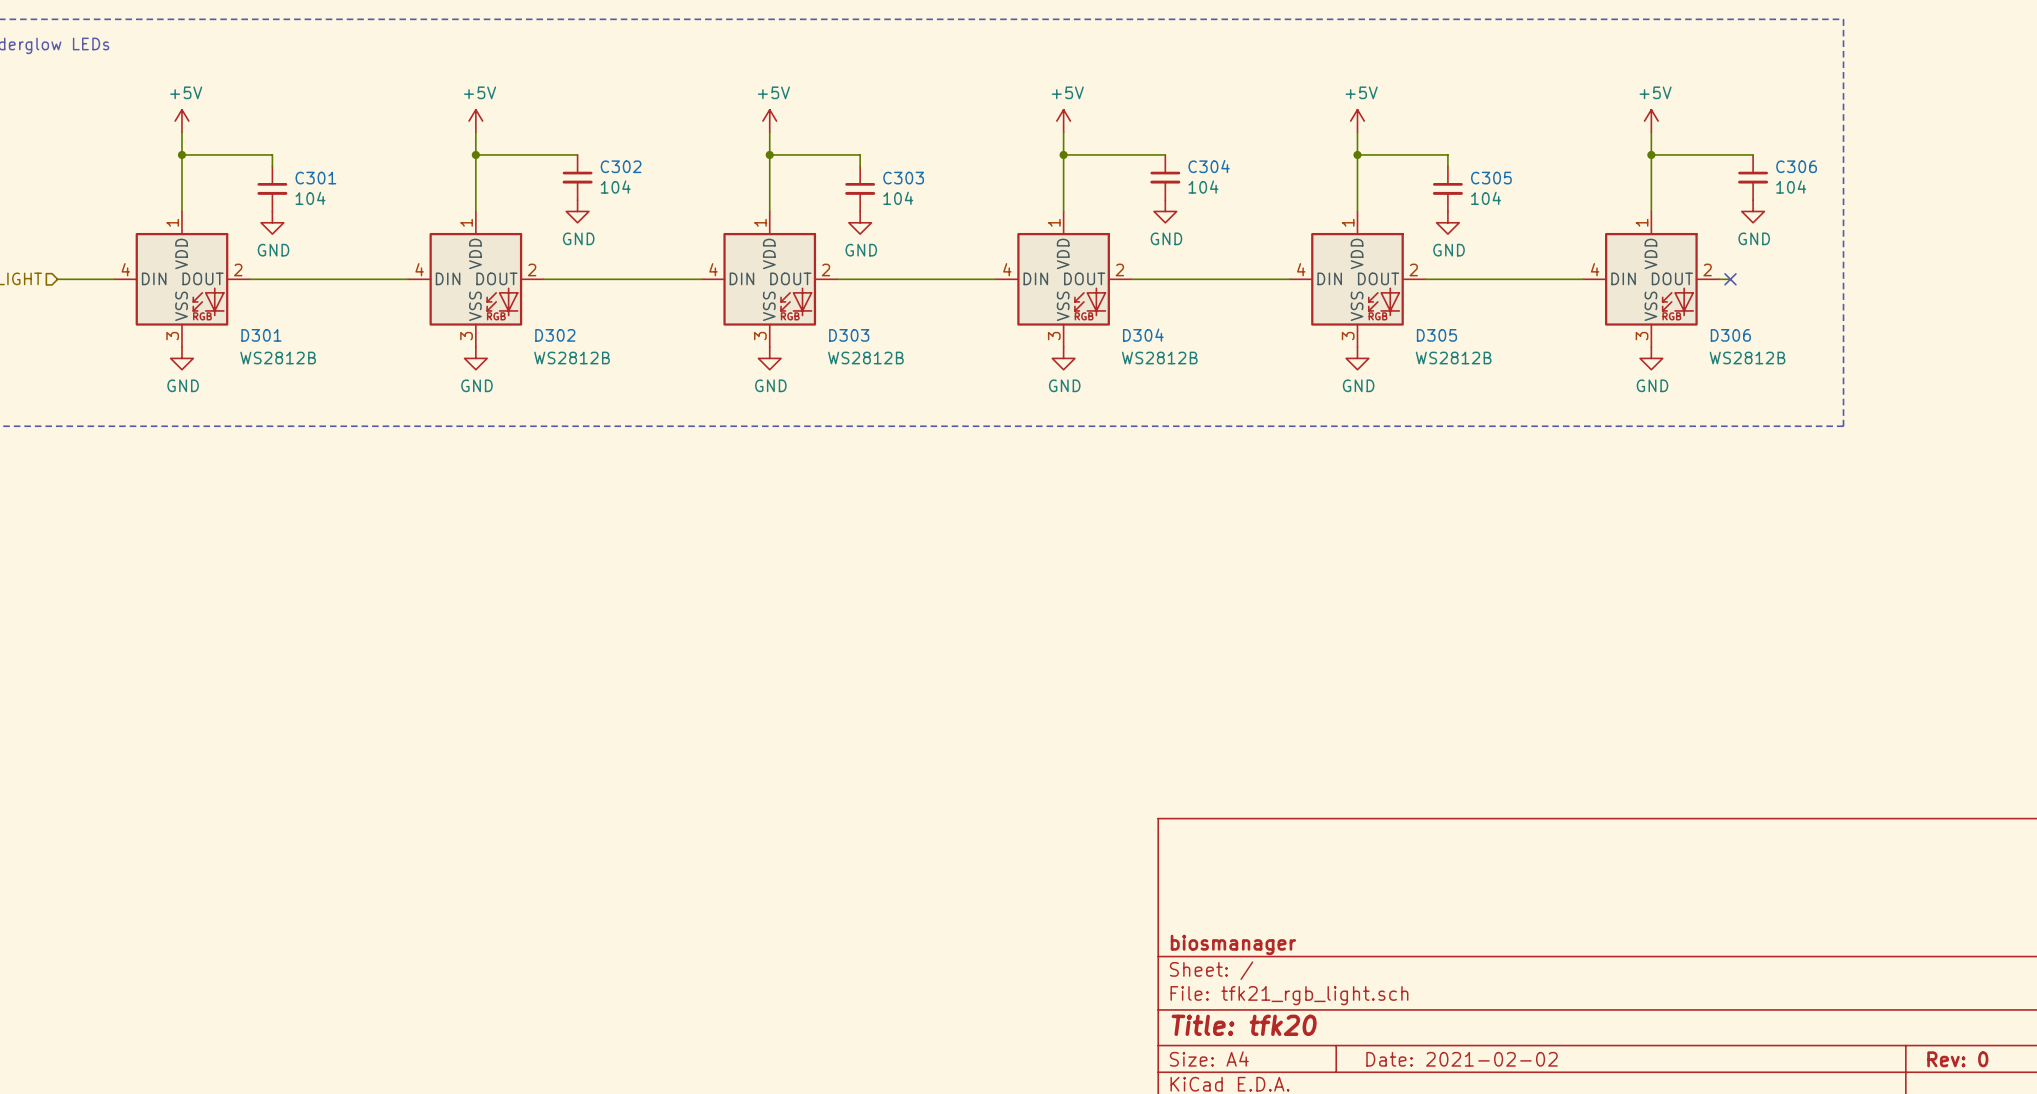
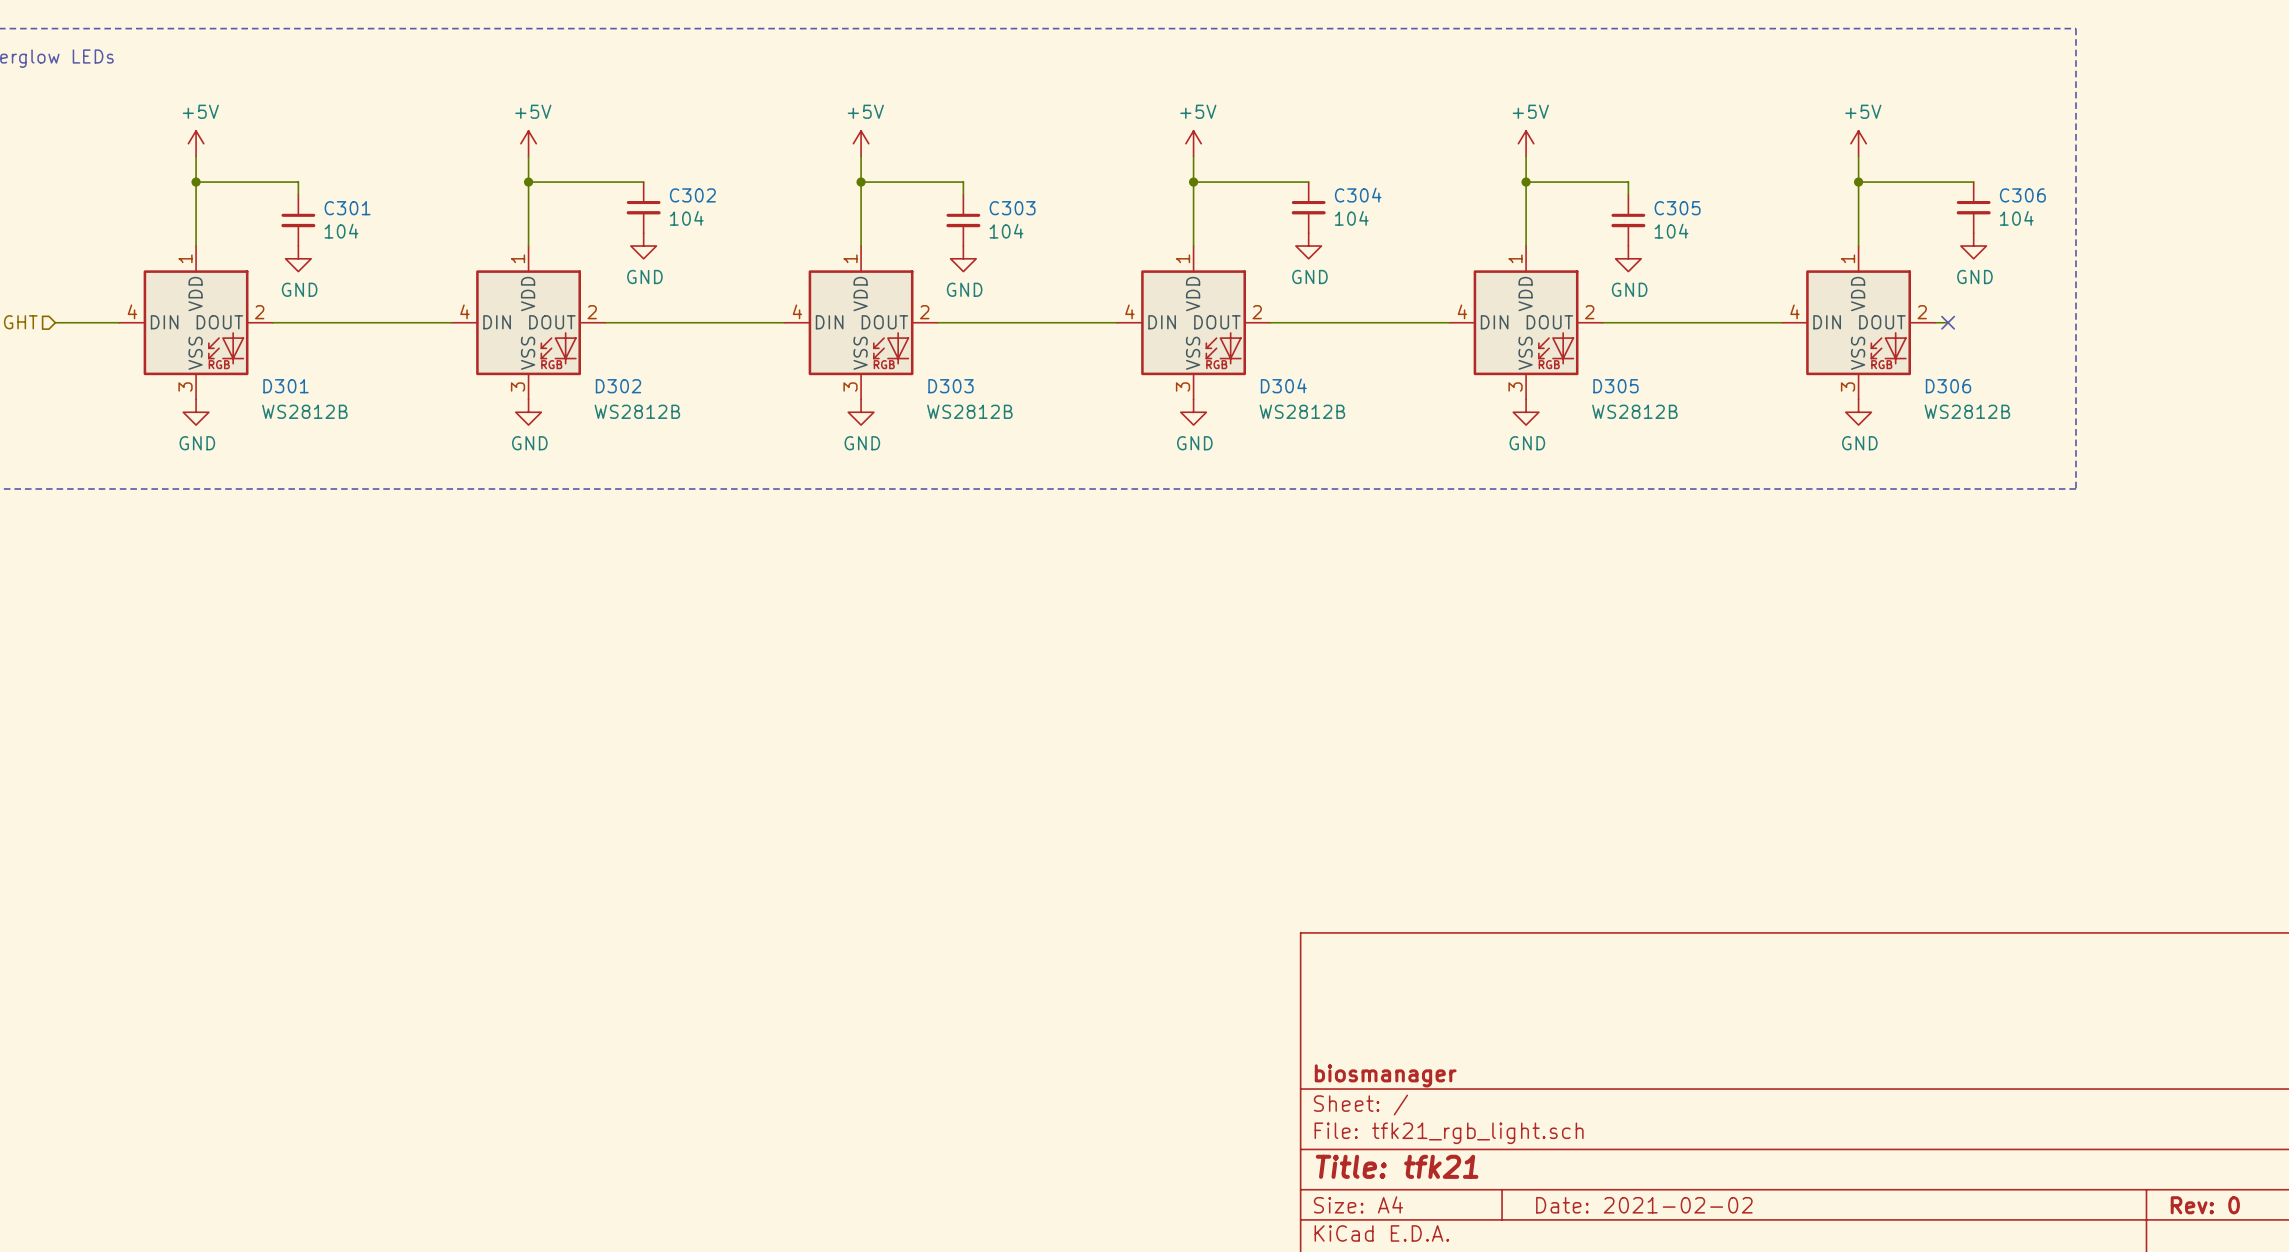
title block: Title: tfk20 (1244, 1025) -> Title: tfk21 (1397, 1166)

